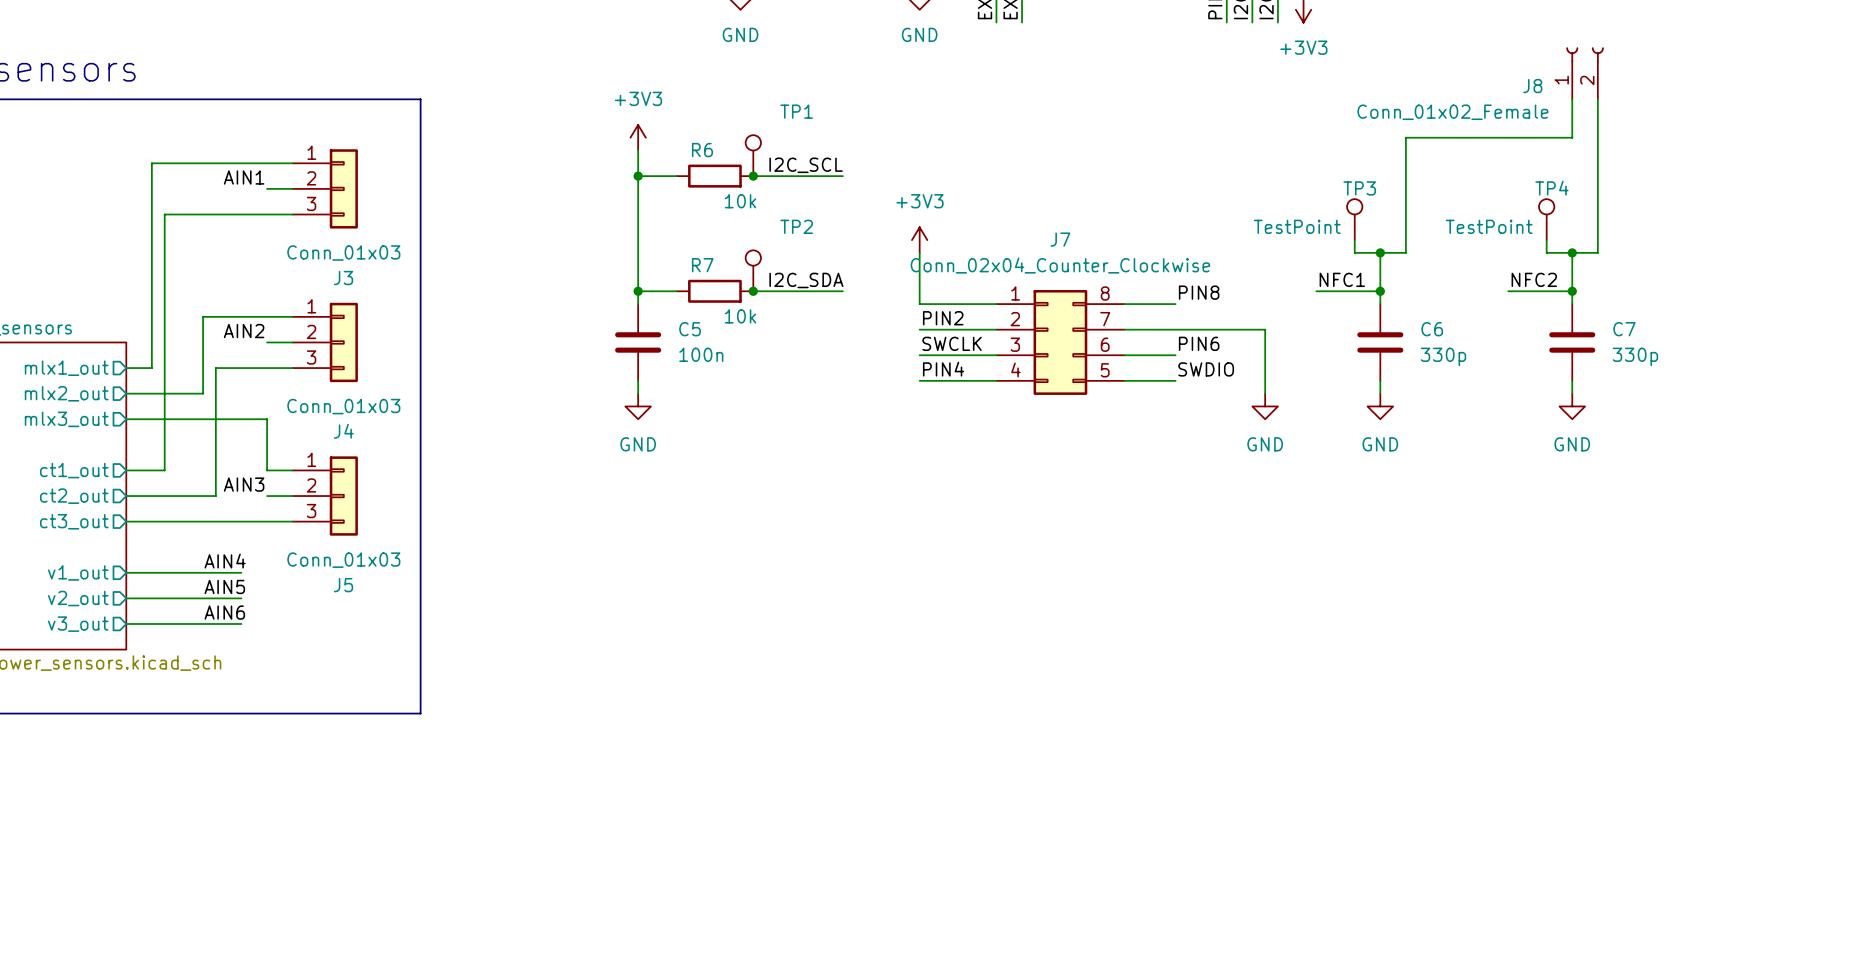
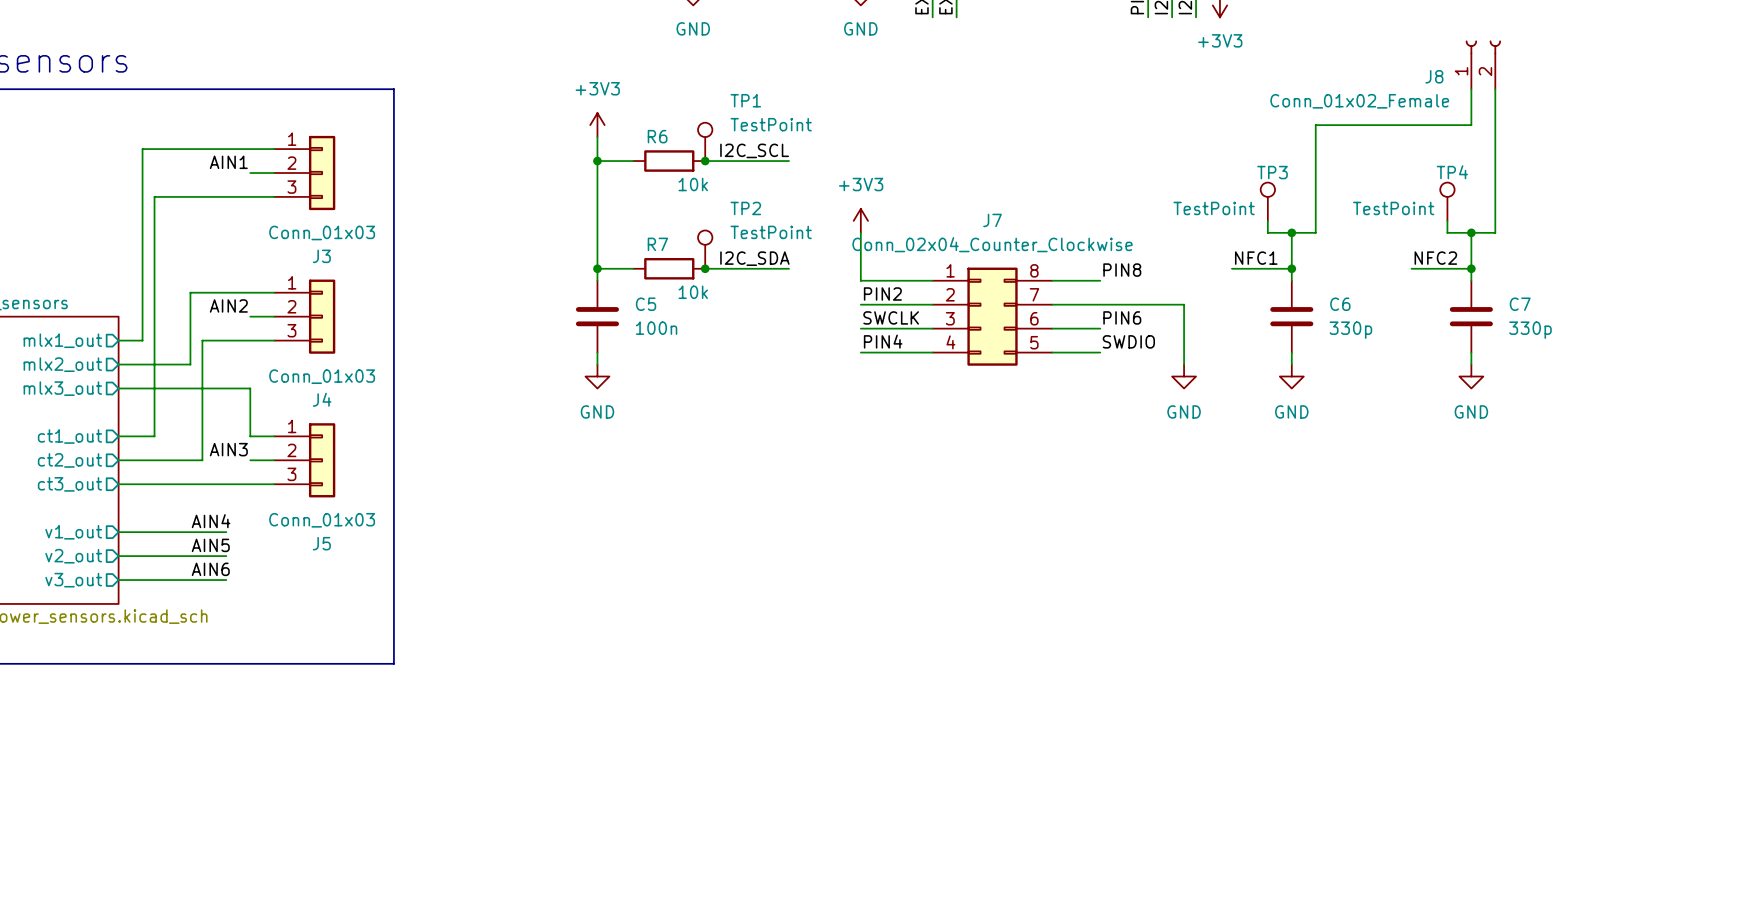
TP1 value: none -> TestPoint (771, 124)
TP2 value: none -> TestPoint (771, 232)

